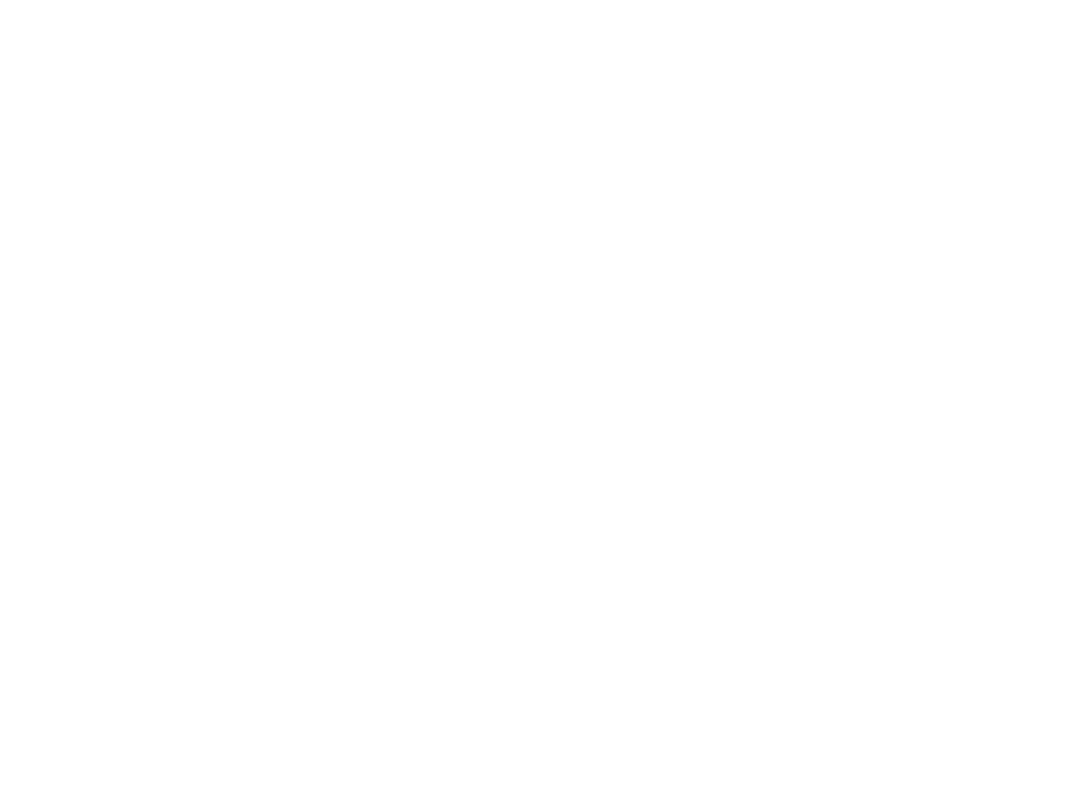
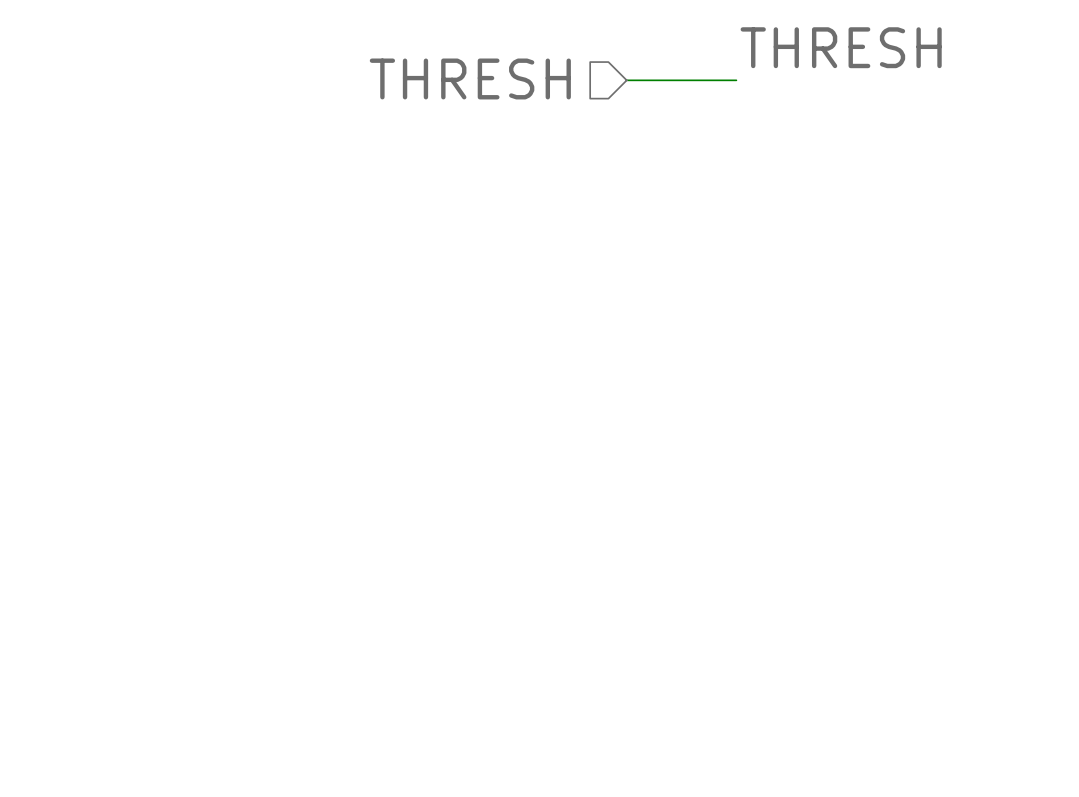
label: none -> THRESH (841, 47)
sheet pin: none -> THRESH (470, 78)
wire: none -> (626, 80) (736, 80)

